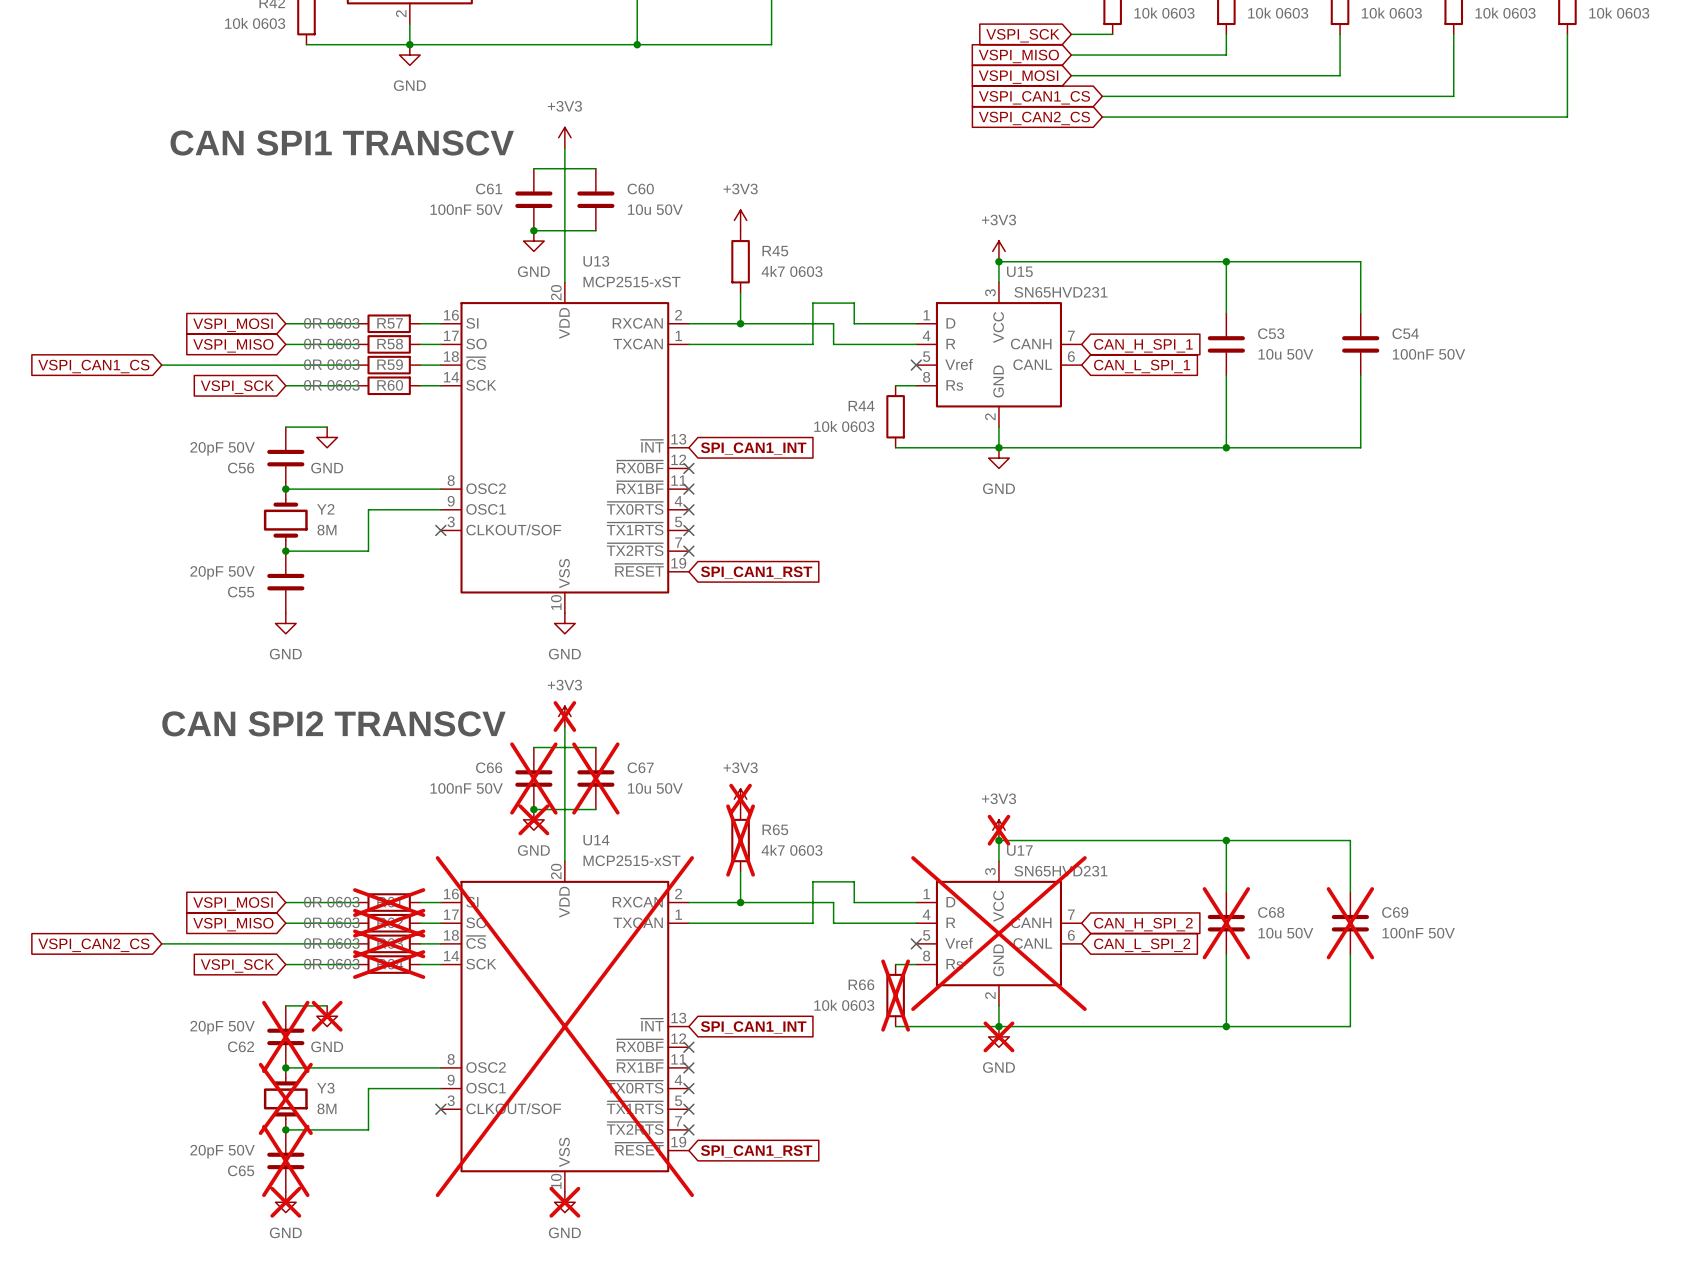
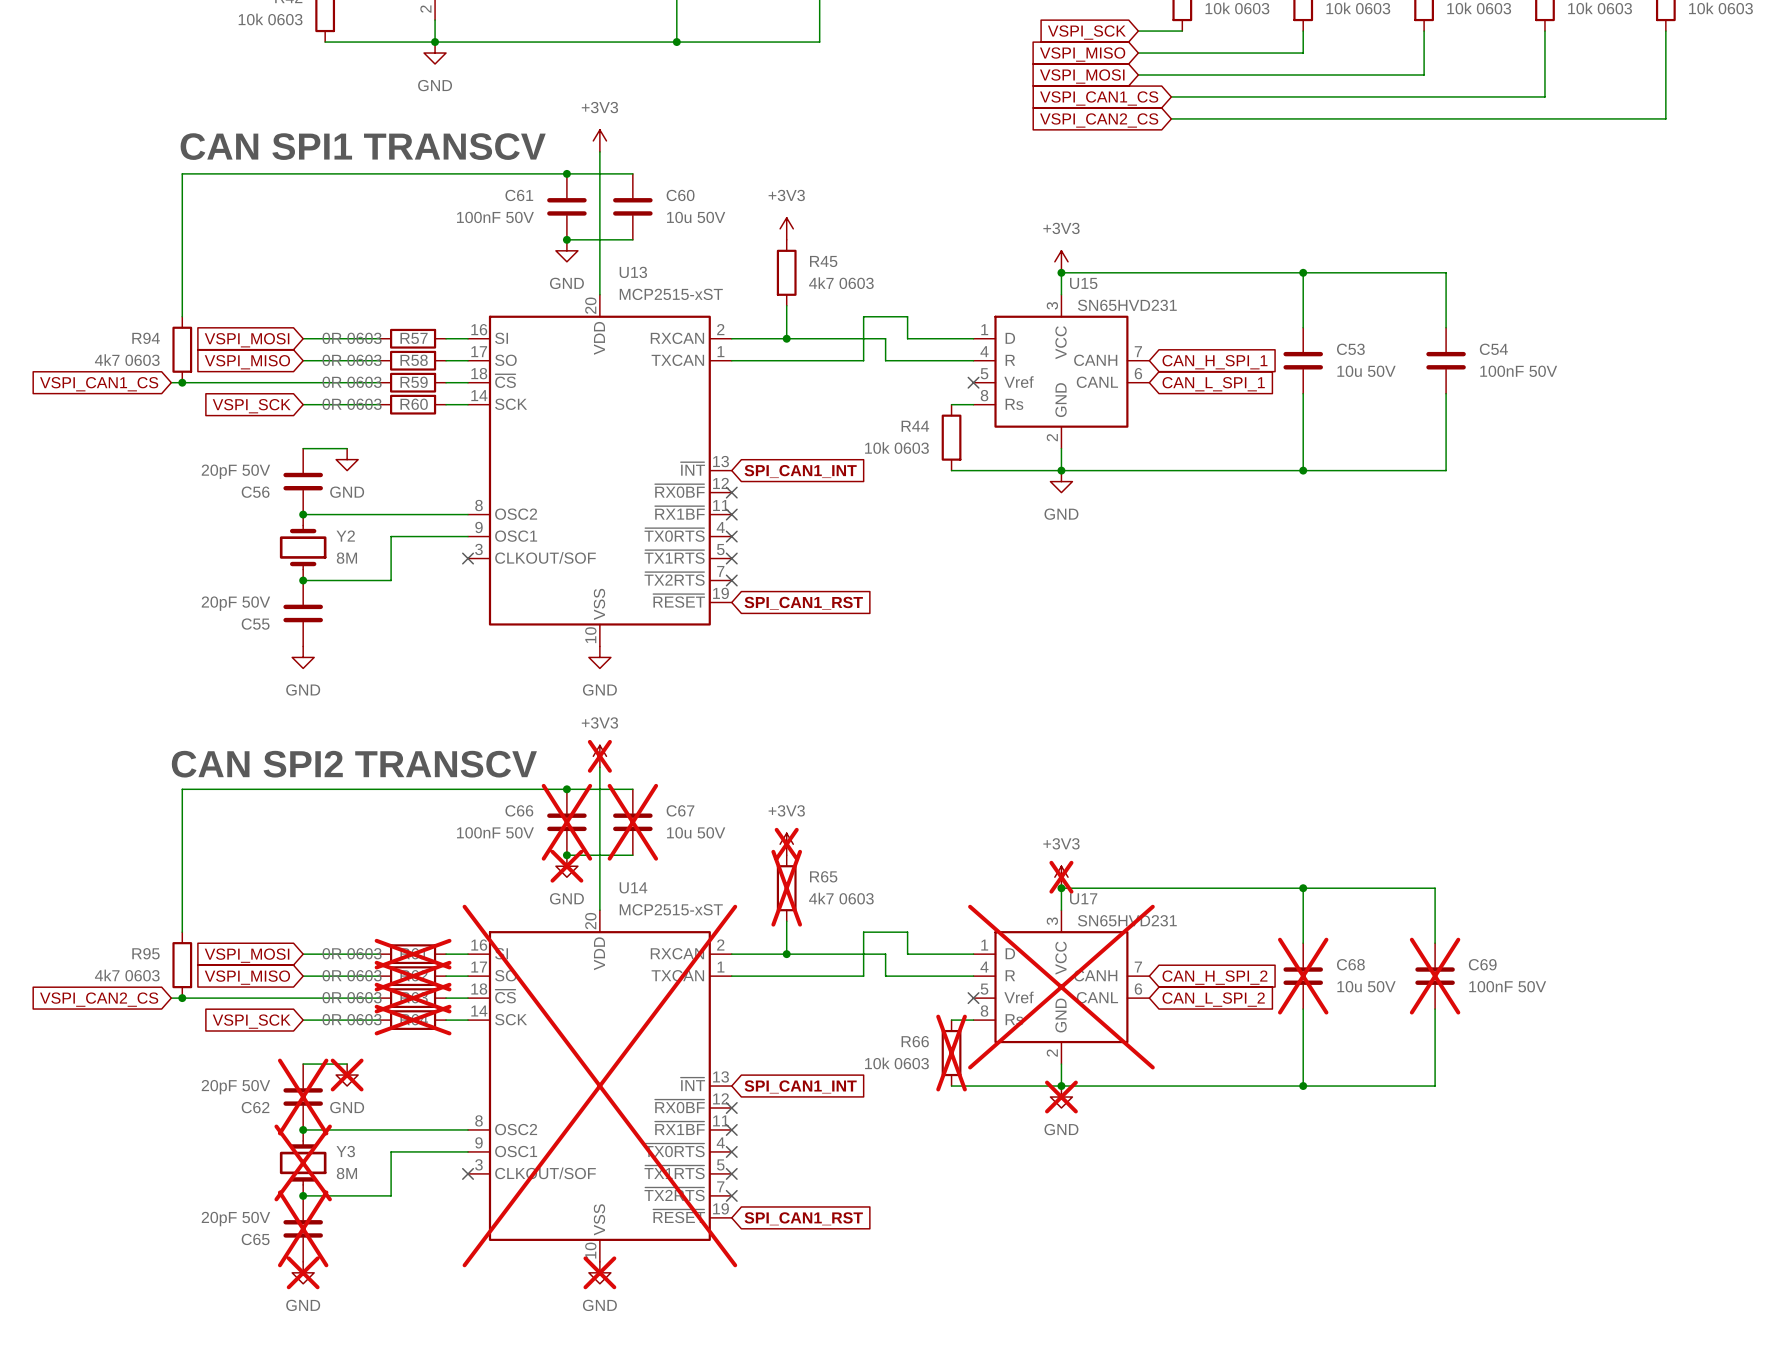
wire: none -> (566, 173) (182, 173) (182, 316)
junction: none -> (566, 173)
R94: none -> 4k7 0603 (182, 349)
junction: none -> (182, 382)
wire: none -> (566, 789) (182, 789) (182, 932)
junction: none -> (566, 789)
R95: none -> 4k7 0603 (182, 965)
junction: none -> (182, 998)

